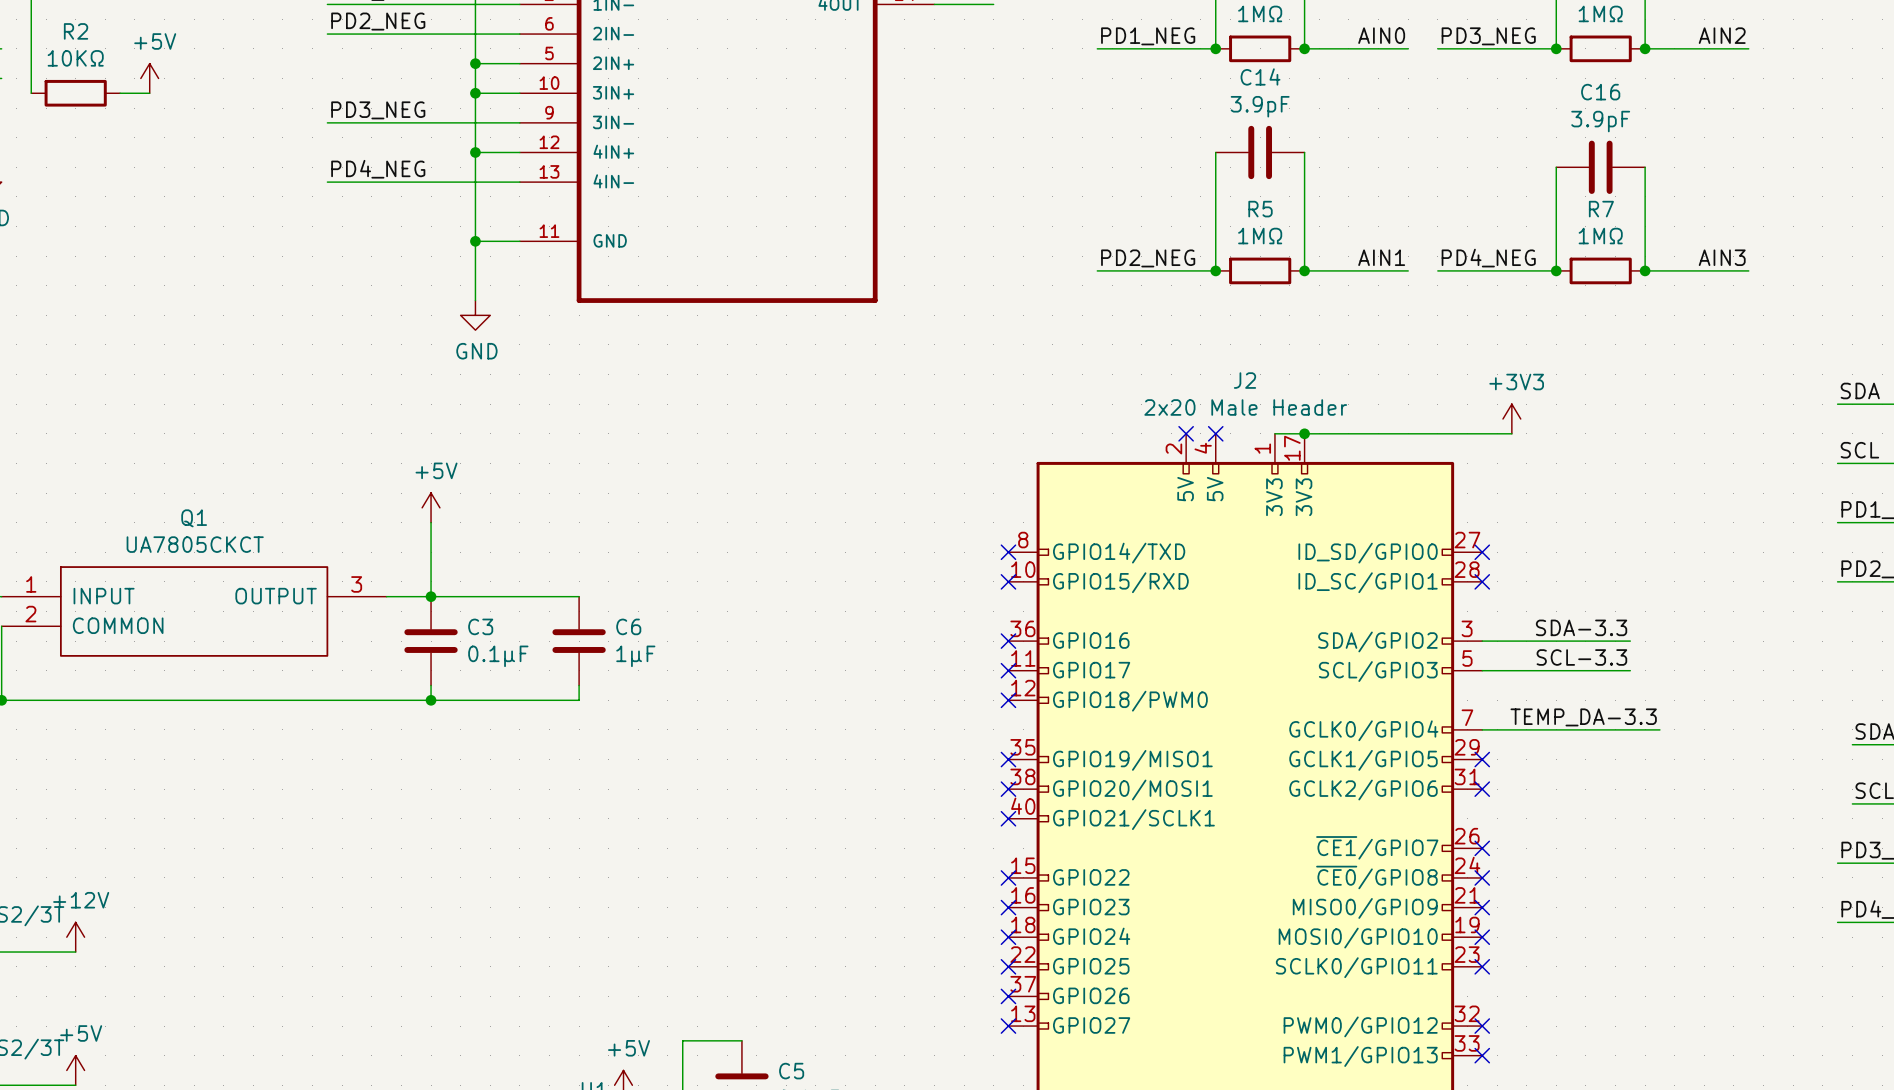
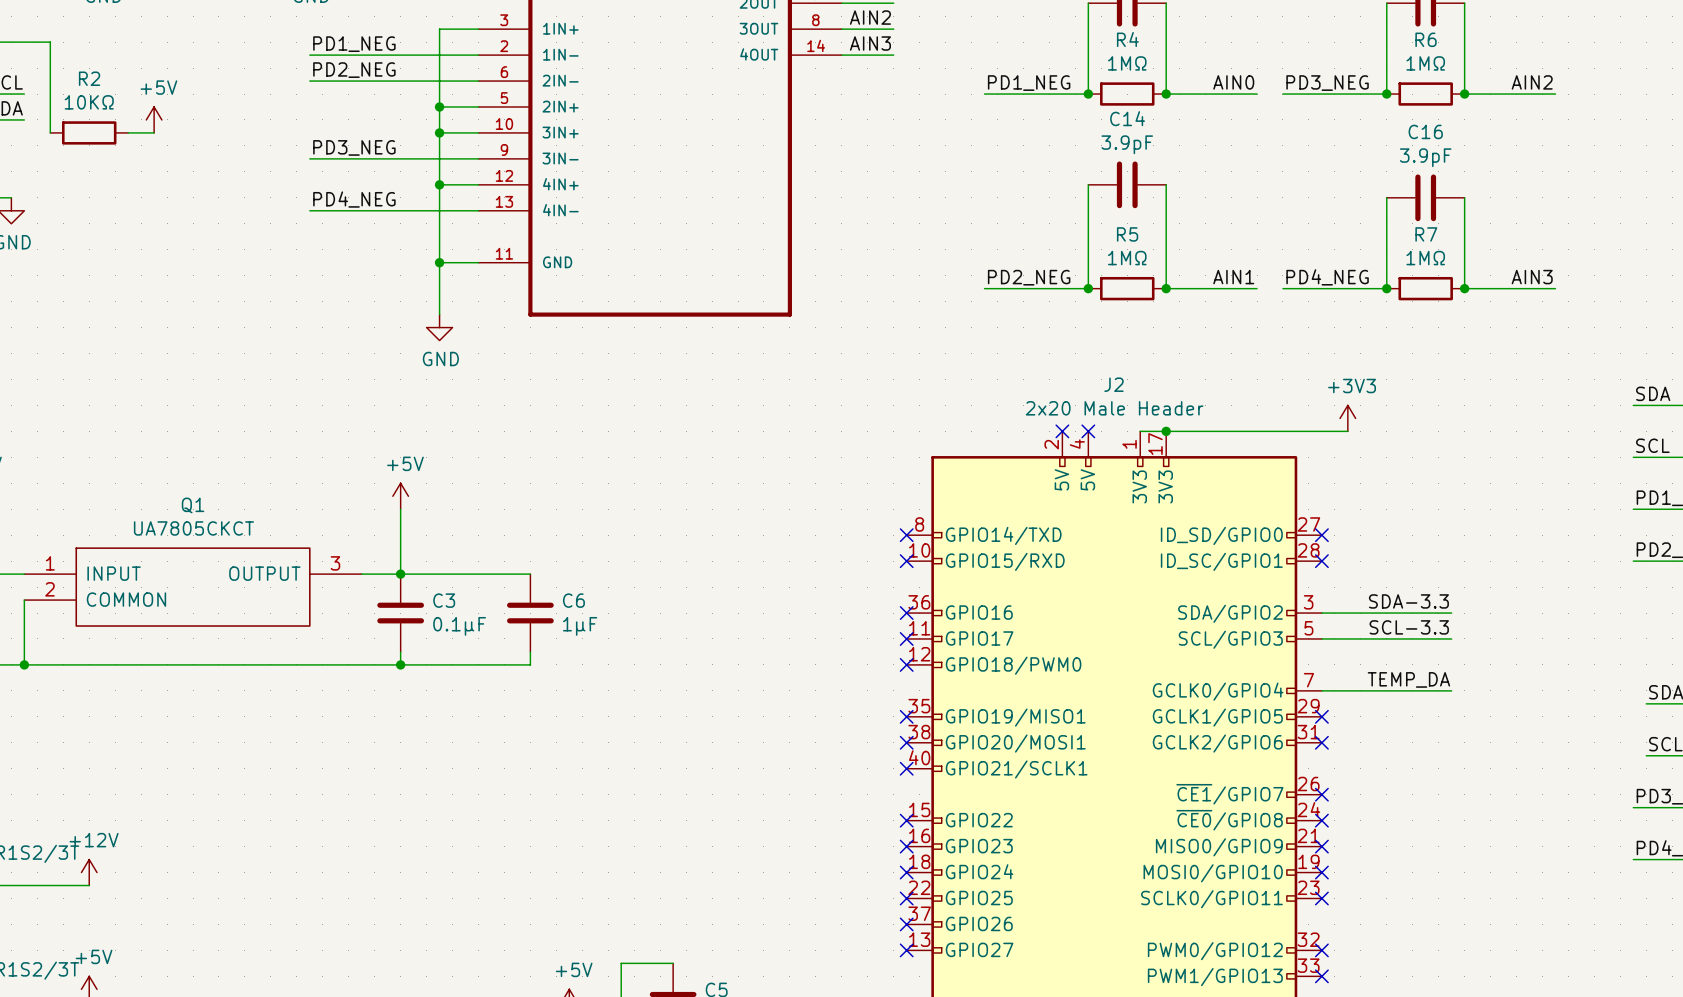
label: TEMP_DA-3.3 (1583, 717) -> TEMP_DA (1408, 679)
wire: (1630, 729) (1659, 729) -> none

